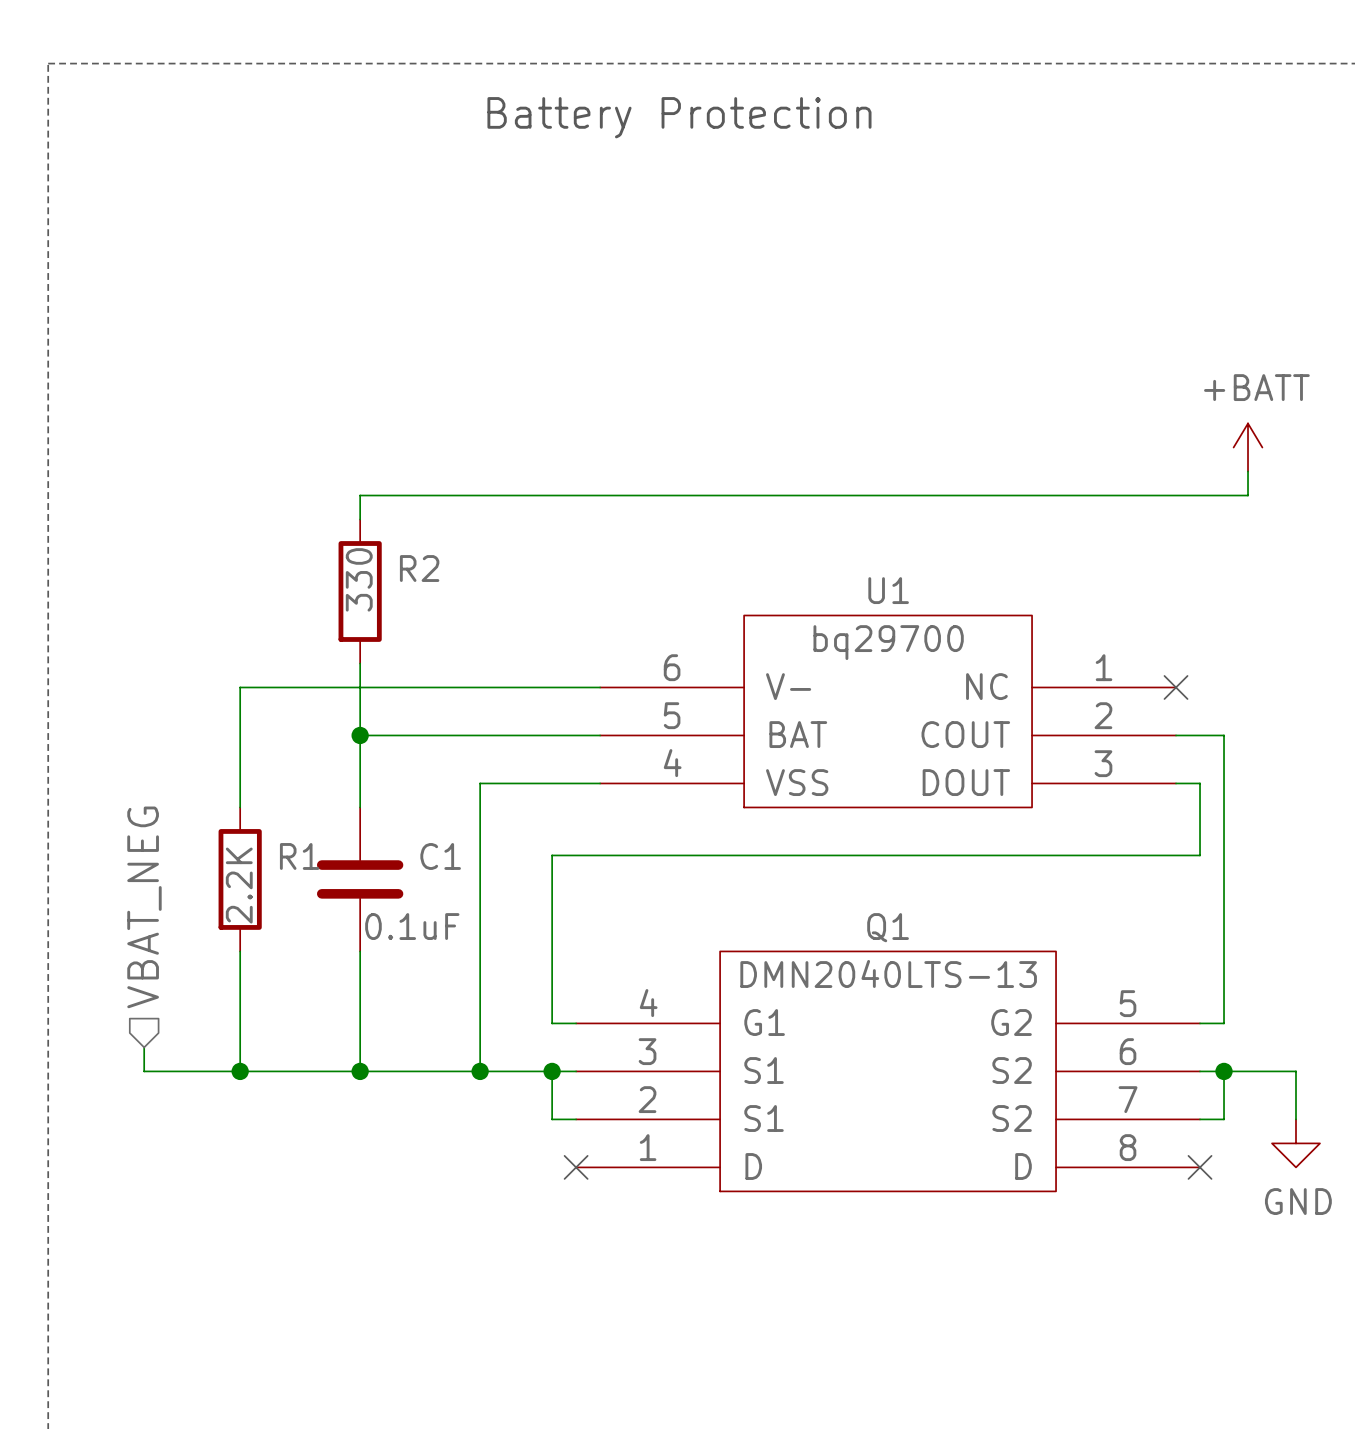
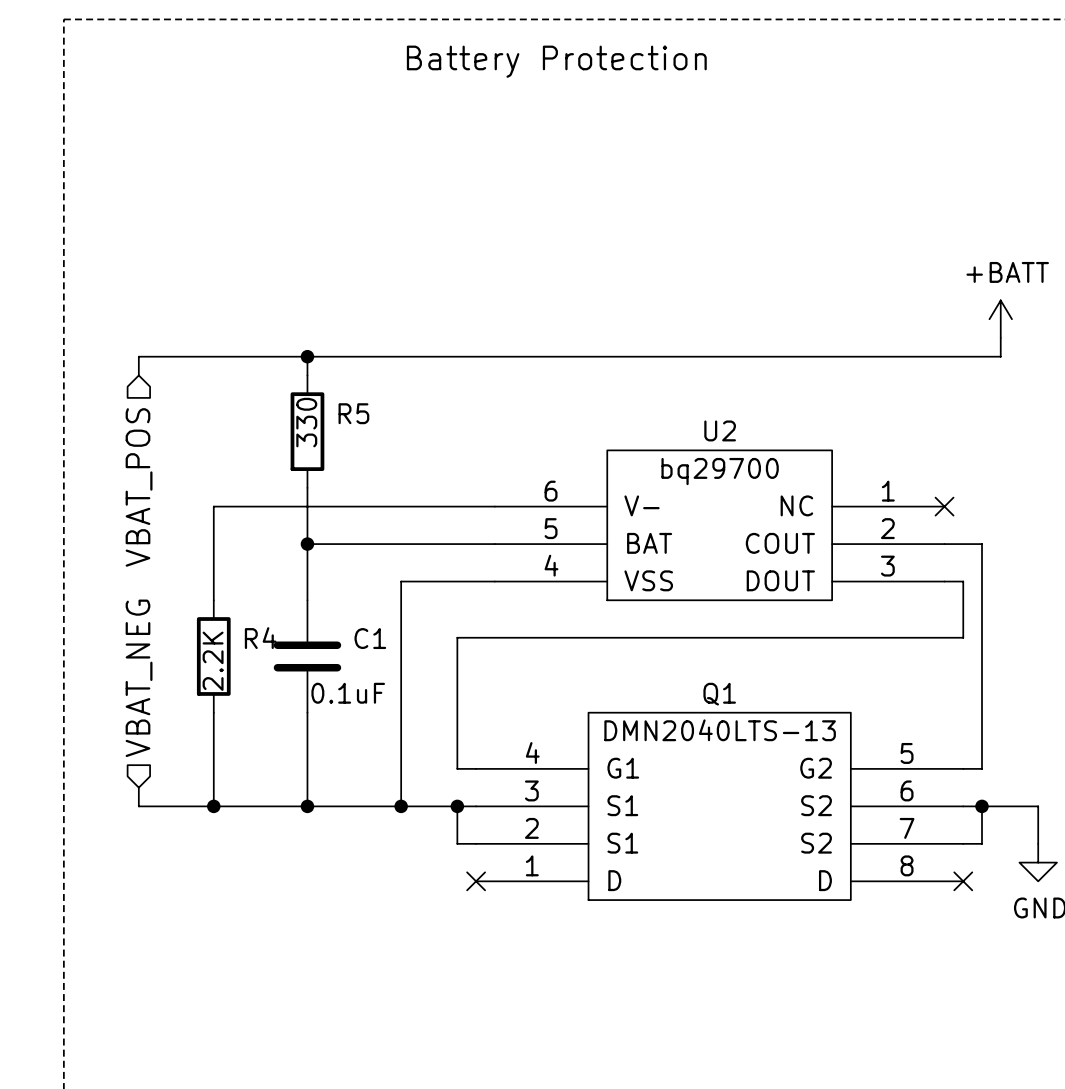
wire: none -> (307, 356) (138, 356) (138, 375)
junction: none -> (307, 356)
R2 name: R2 (419, 568) -> R5 (353, 413)
U1 name: U1 (888, 590) -> U2 (720, 430)
hierarchical label: none -> VBAT_POS (139, 487)
R1 name: R1 (299, 856) -> R4 (260, 638)

